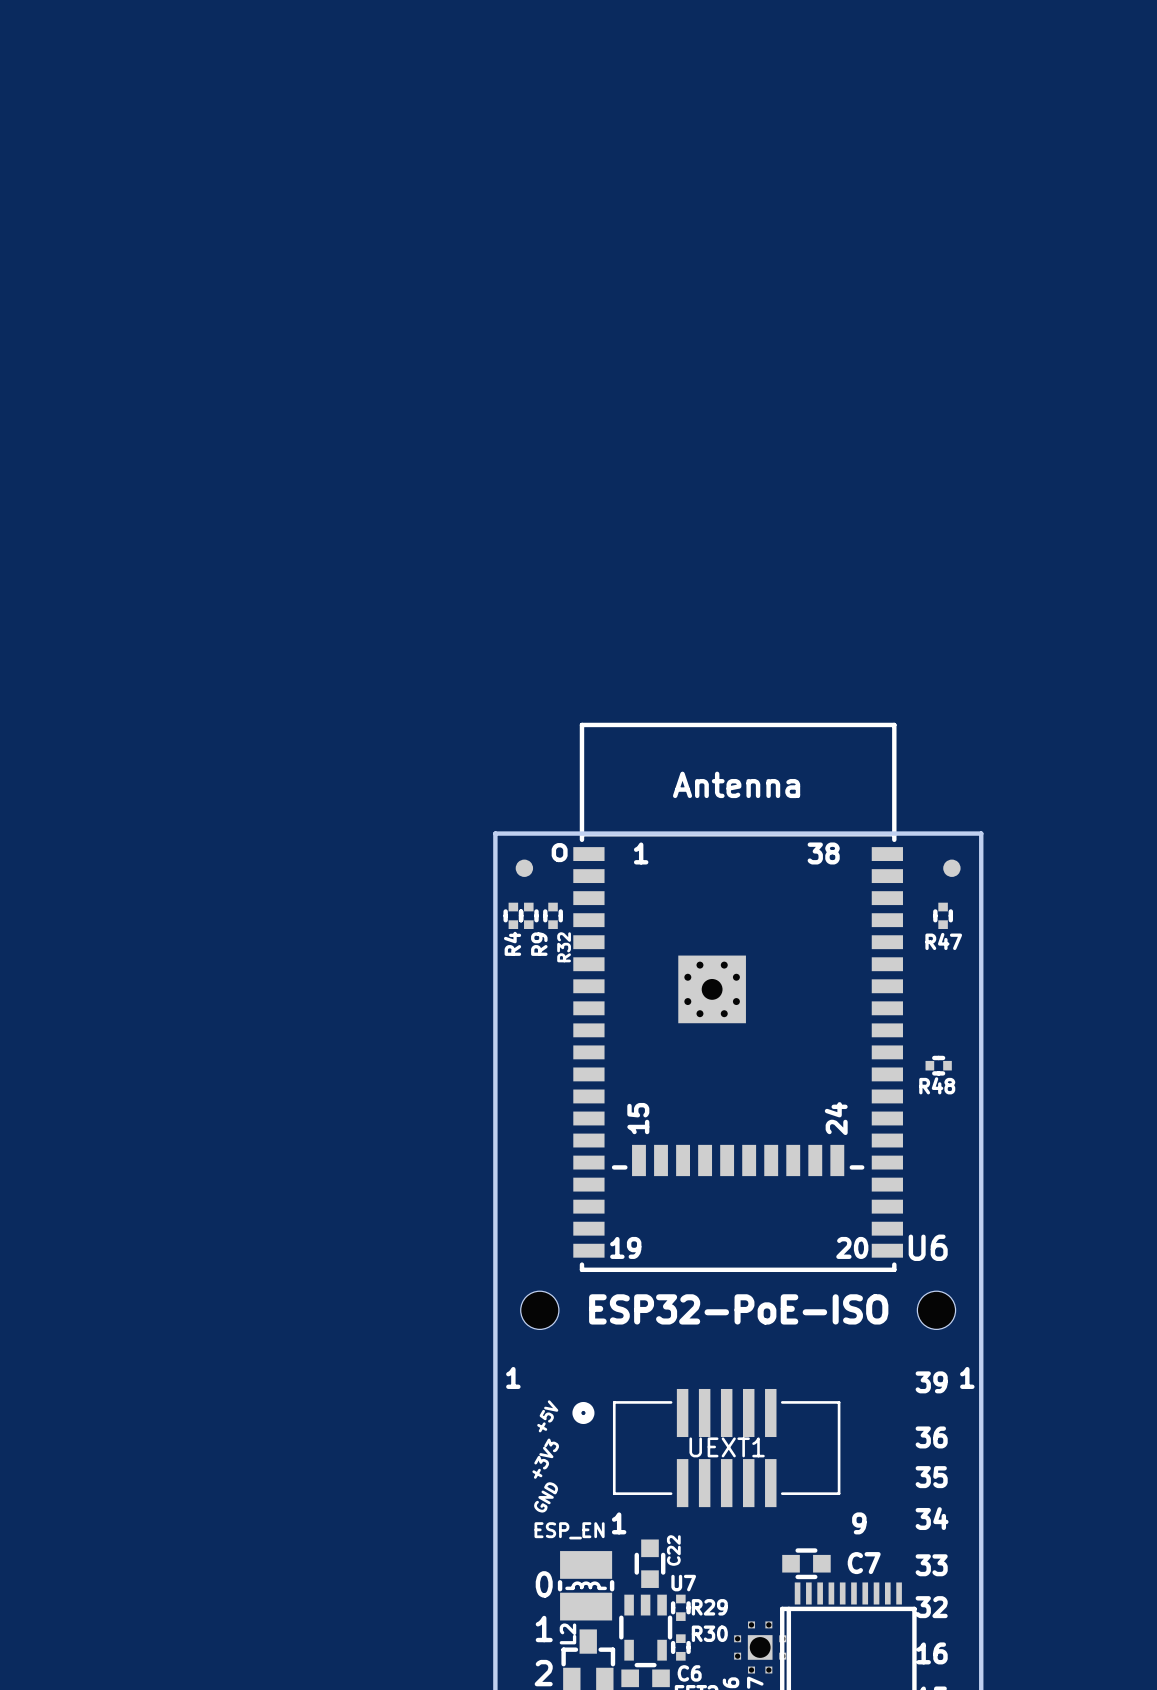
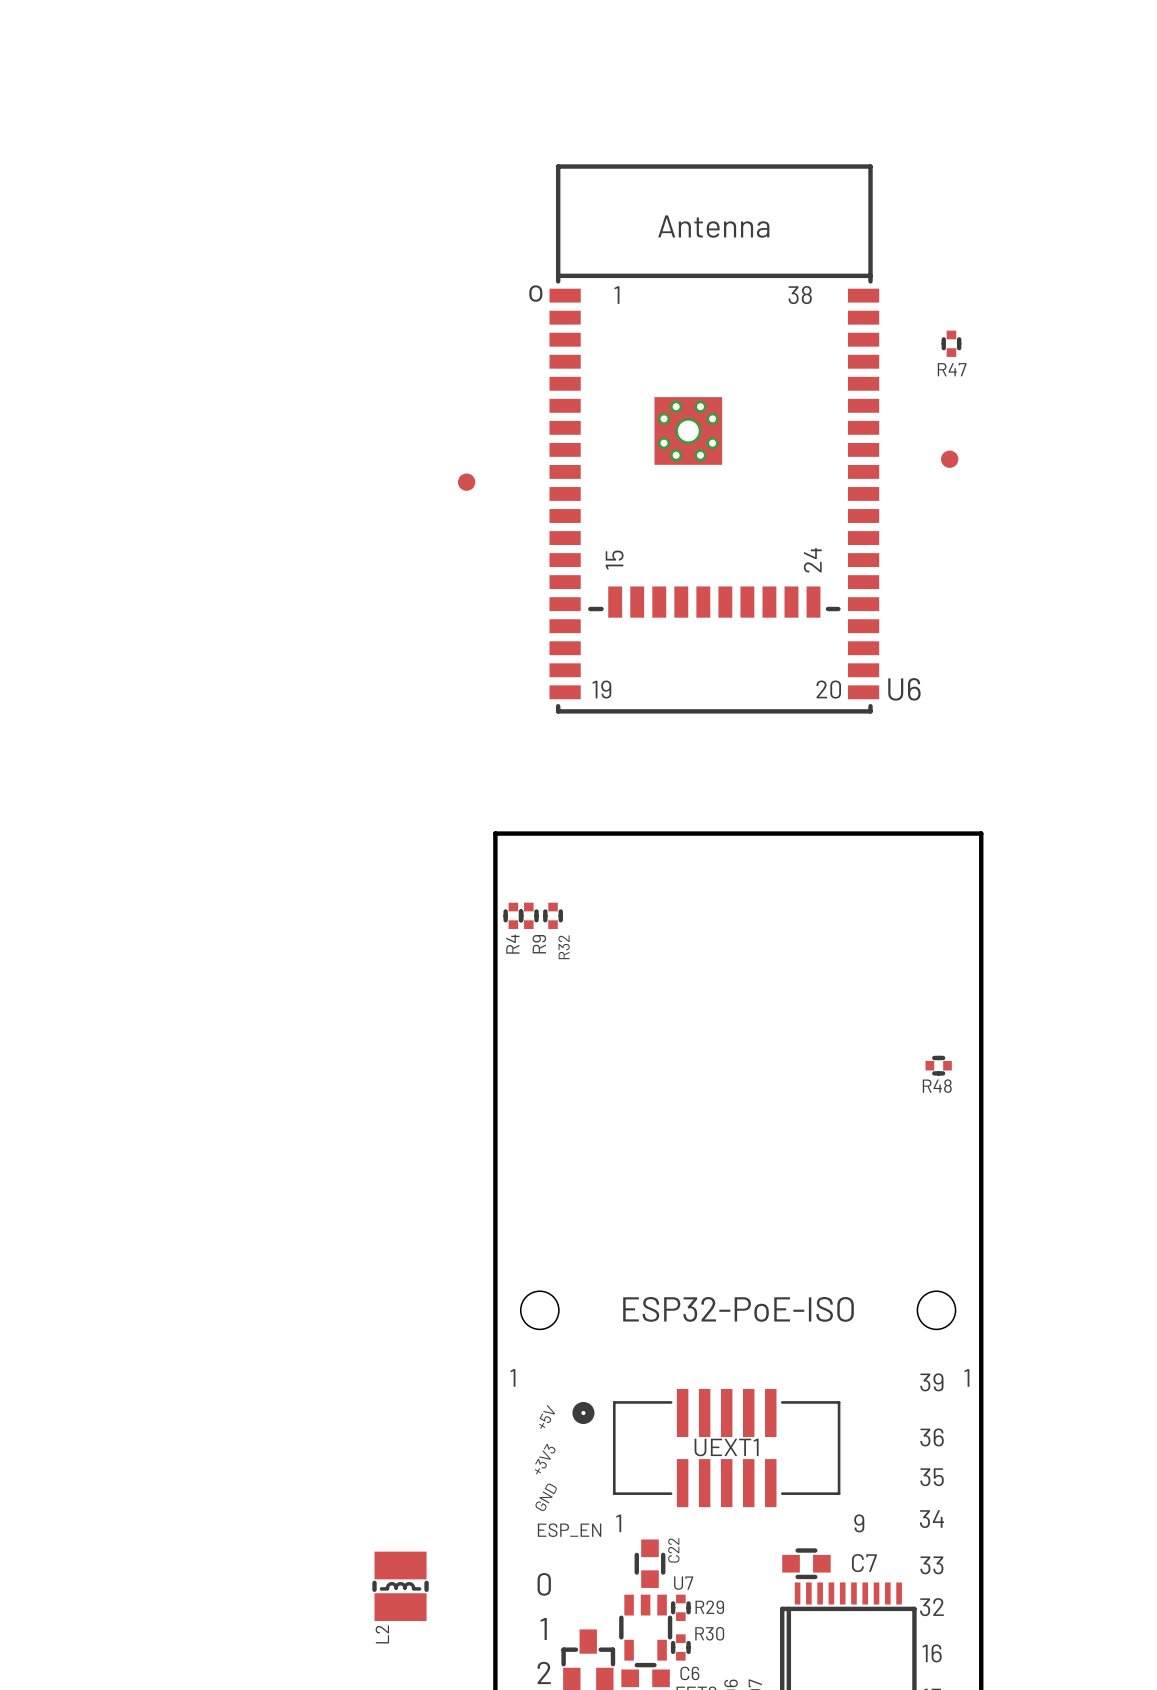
part: none -> (949, 459)
part: none -> (466, 482)
part: (524, 868) -> none
part: (951, 868) -> none
R47 position: (943, 915) -> (951, 343)
U6 position: (738, 997) -> (714, 438)
L2 position: (586, 1585) -> (400, 1586)
part: (760, 1647) -> none

